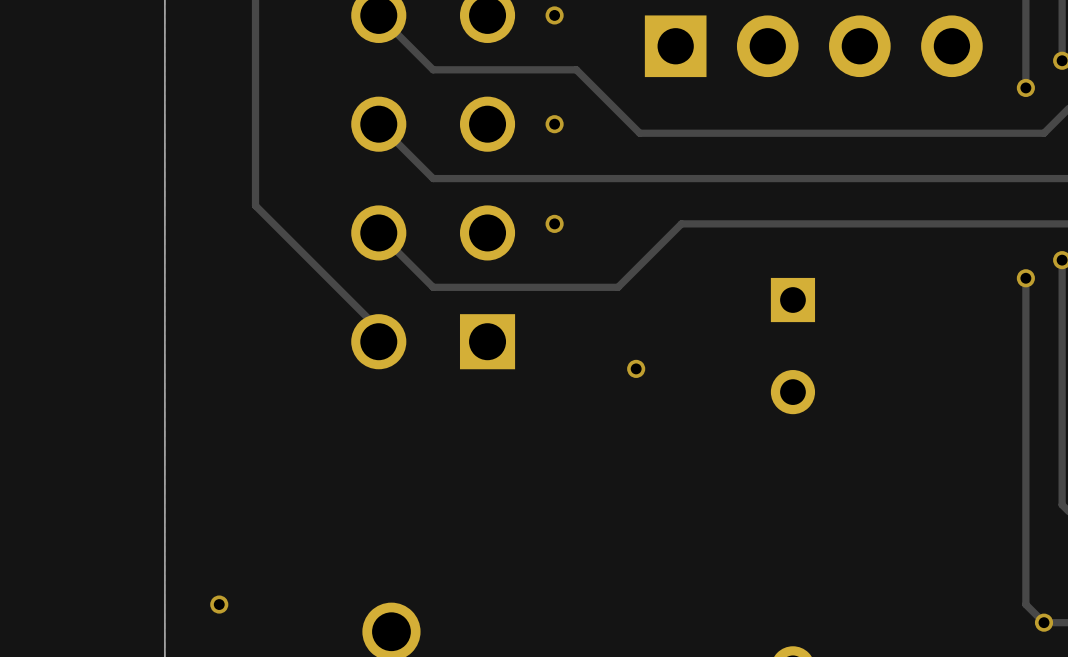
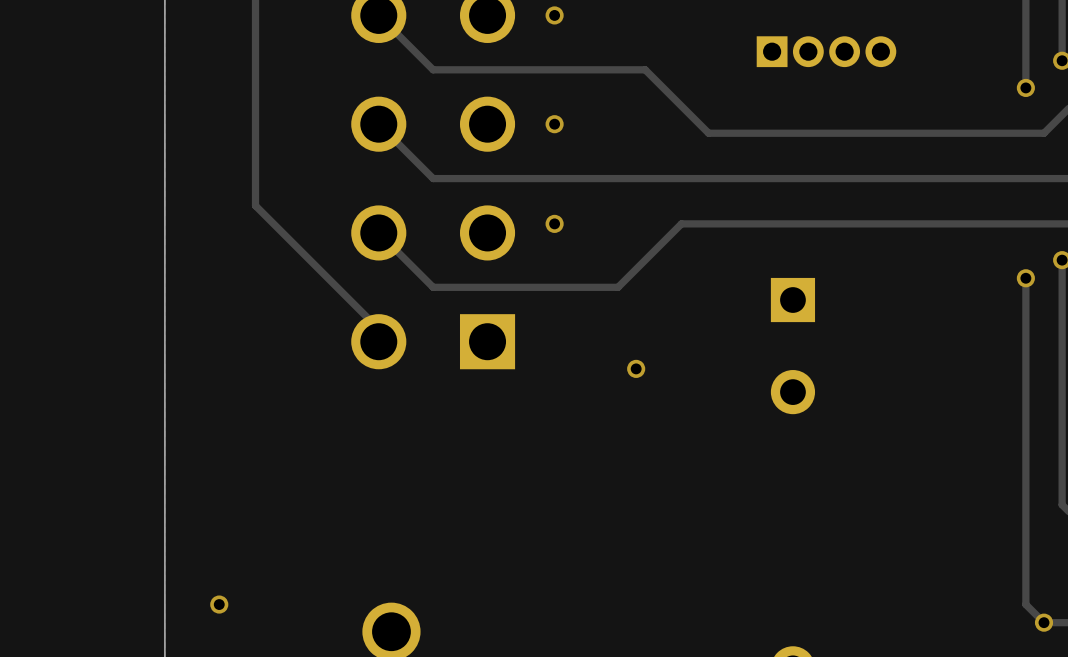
part footprint: [644, 15, 983, 78] -> [756, 36, 897, 68]
track: (576, 69) (639, 133) (708, 133) -> (576, 69) (645, 69) (708, 133)

